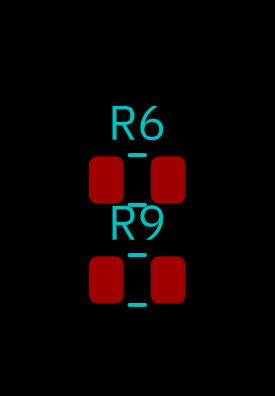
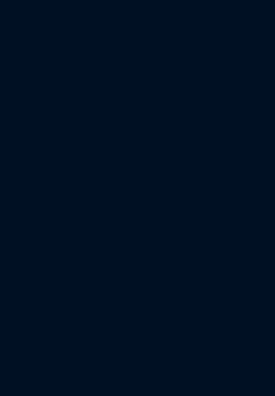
R6: (137, 179) -> none
R9: (137, 279) -> none

